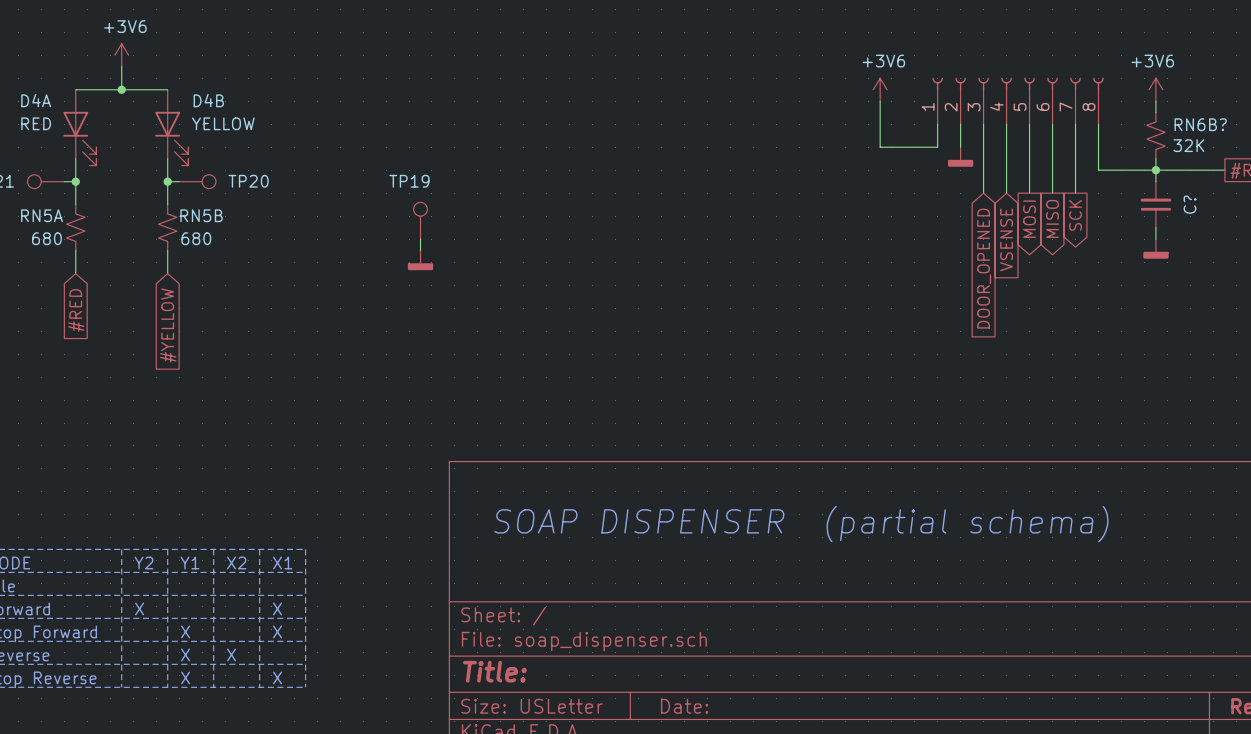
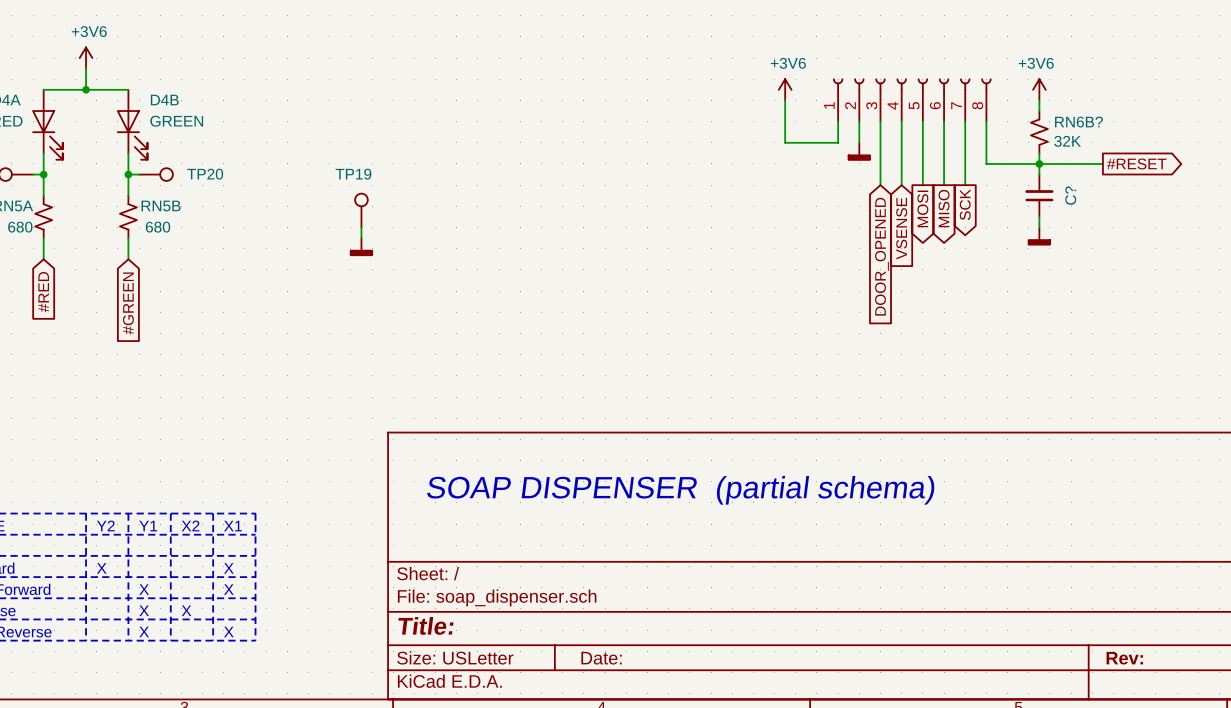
D4B value: YELLOW (223, 123) -> GREEN (176, 121)
global label: #YELLOW (168, 325) -> #GREEN (128, 303)

